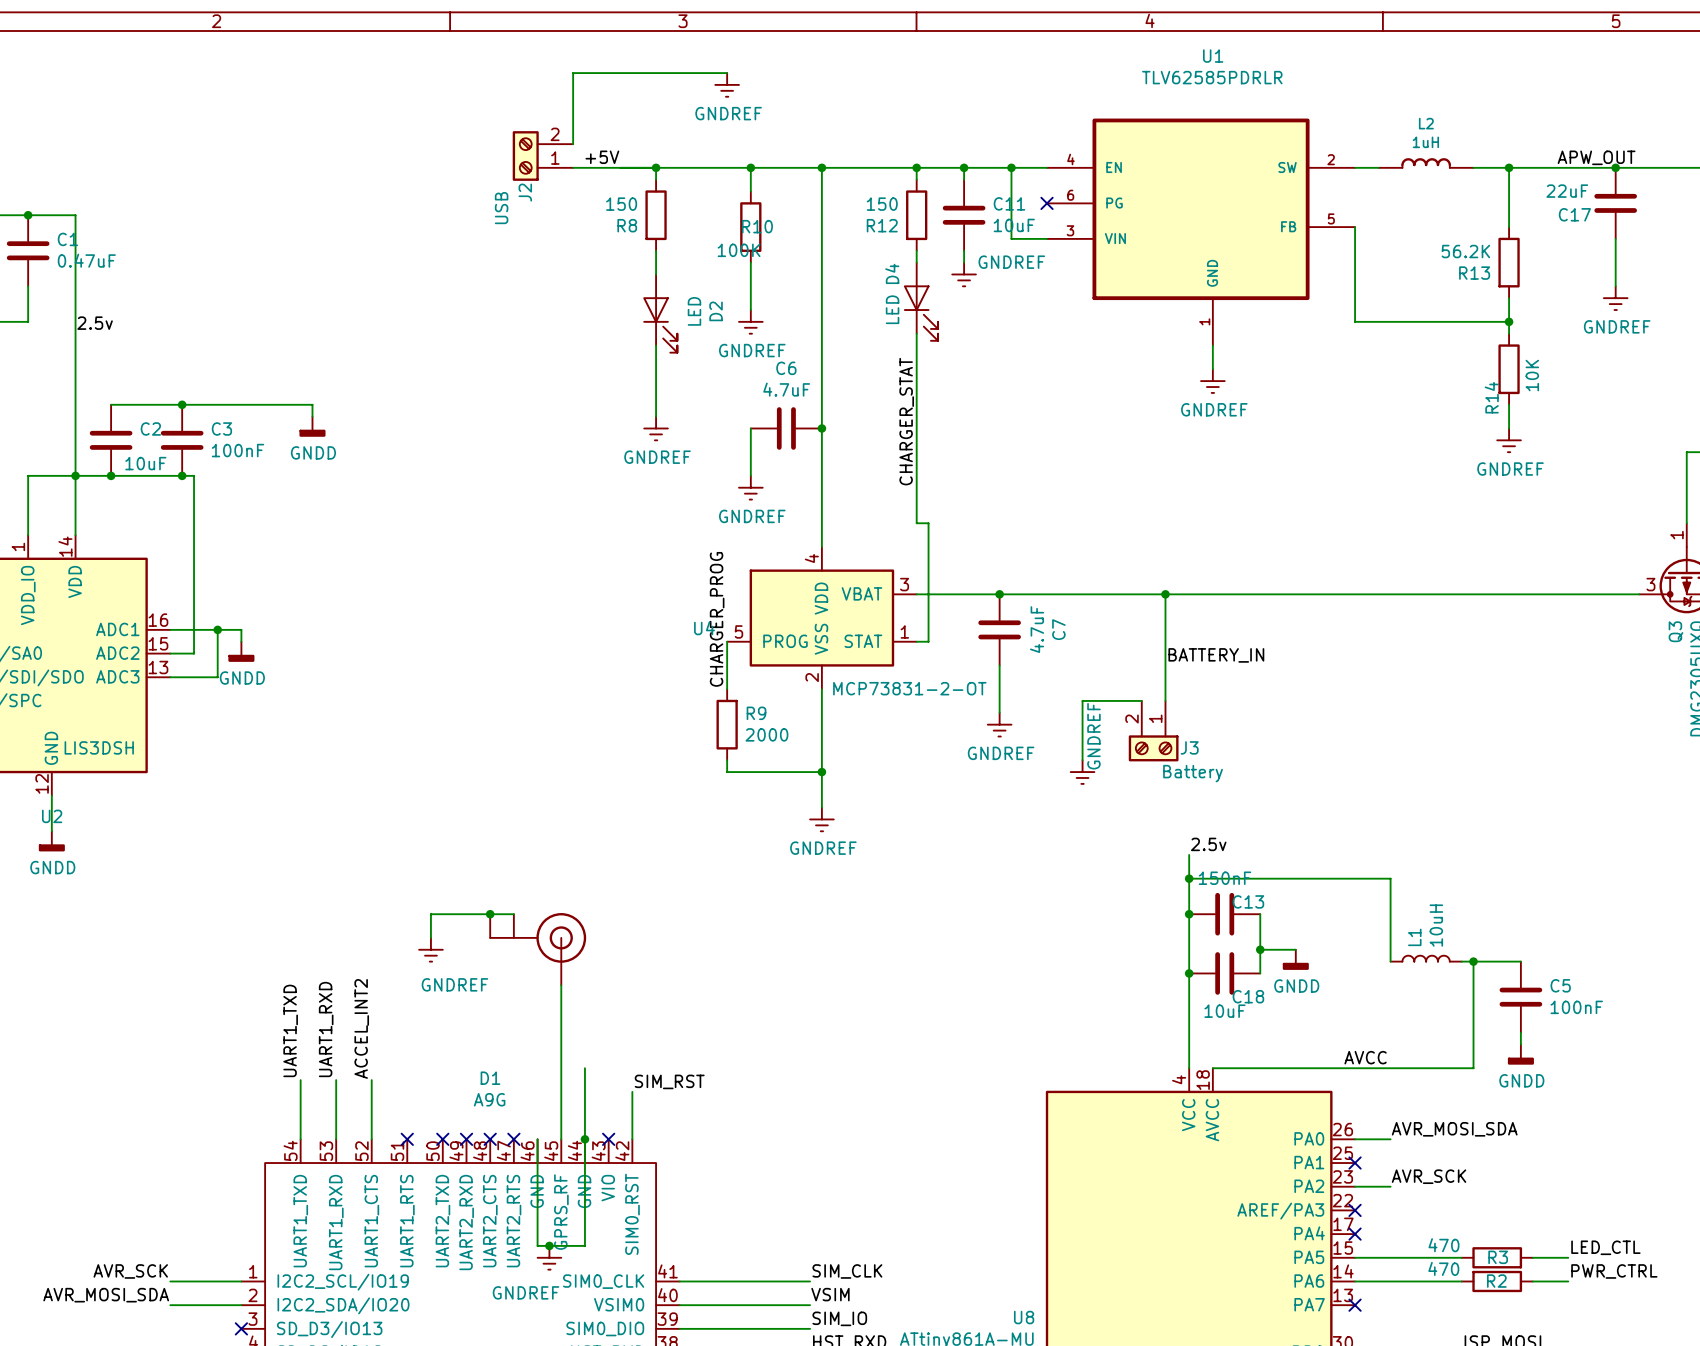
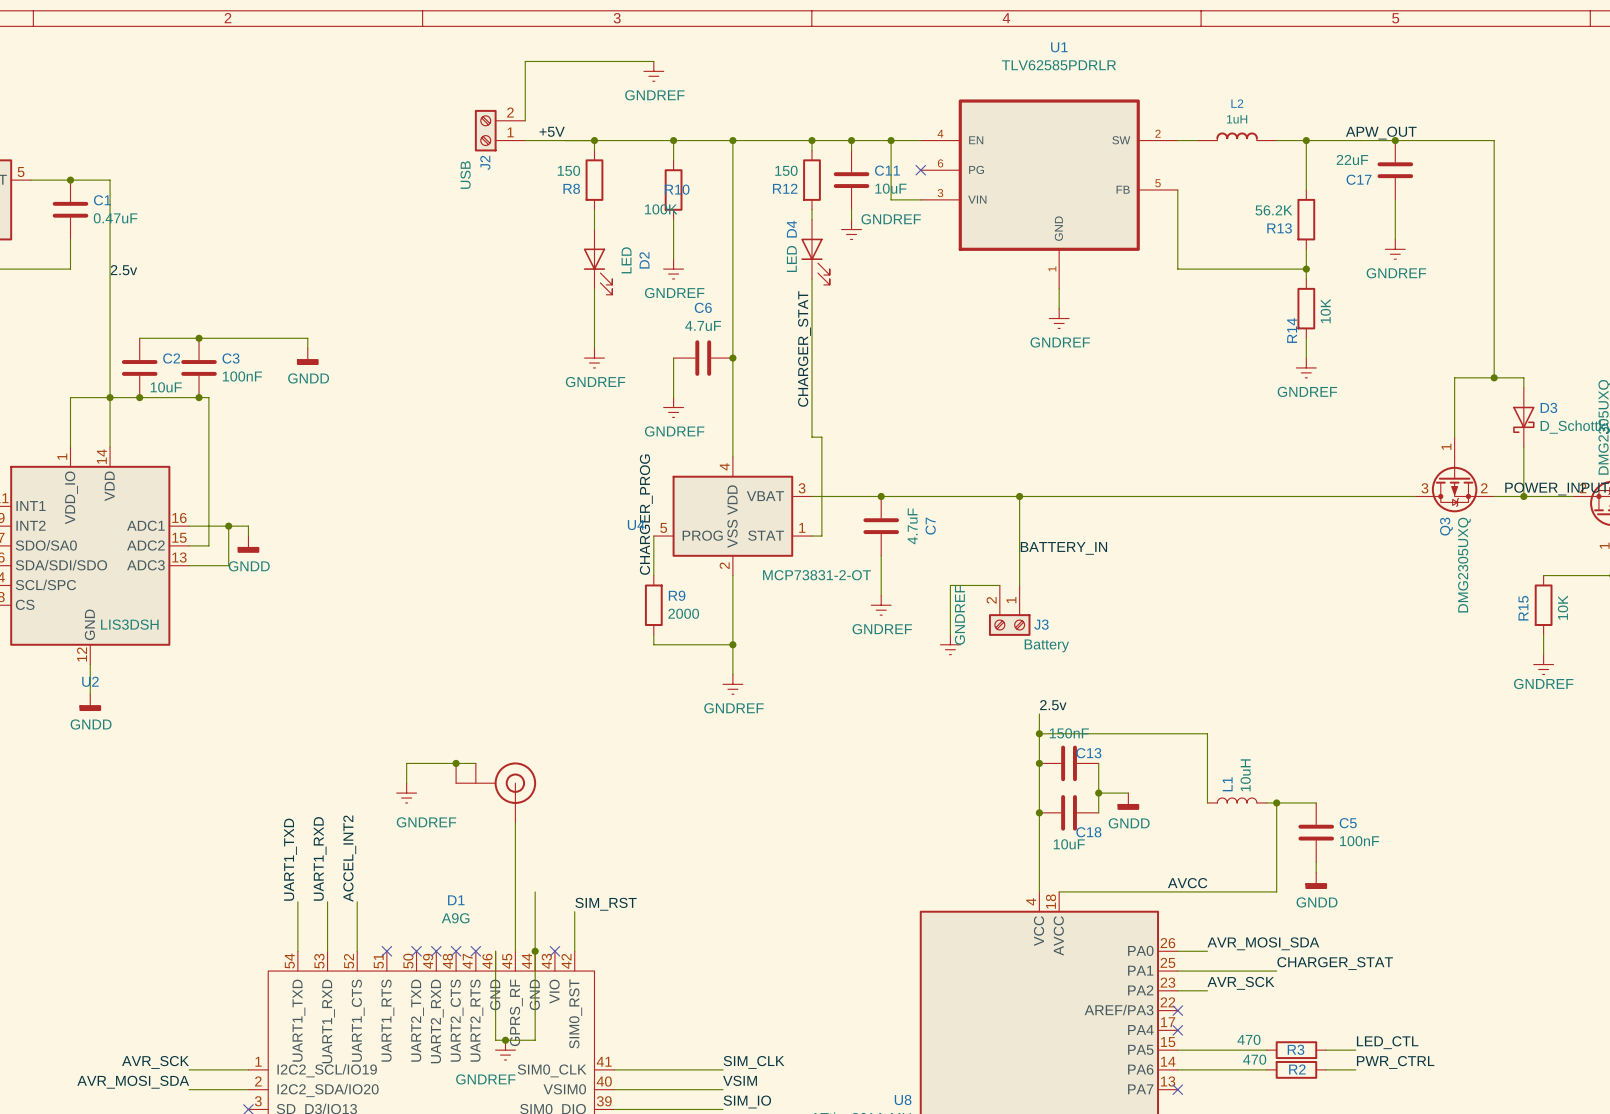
label: none -> CHARGER_STAT (1335, 963)
wire: none -> (1177, 971) (1276, 971)
no-connect mark: (1355, 1163) -> none

